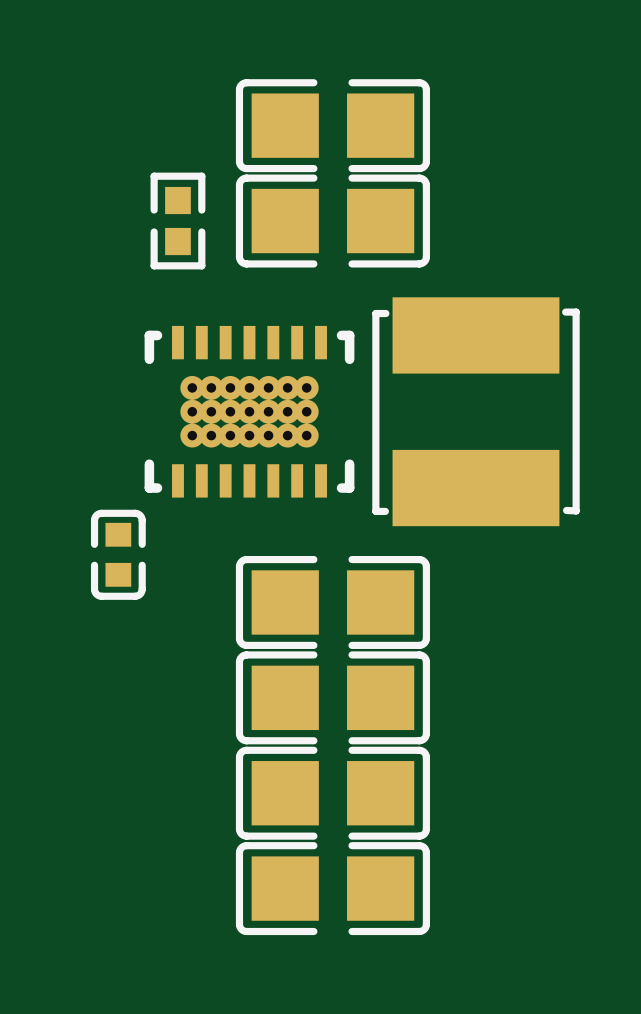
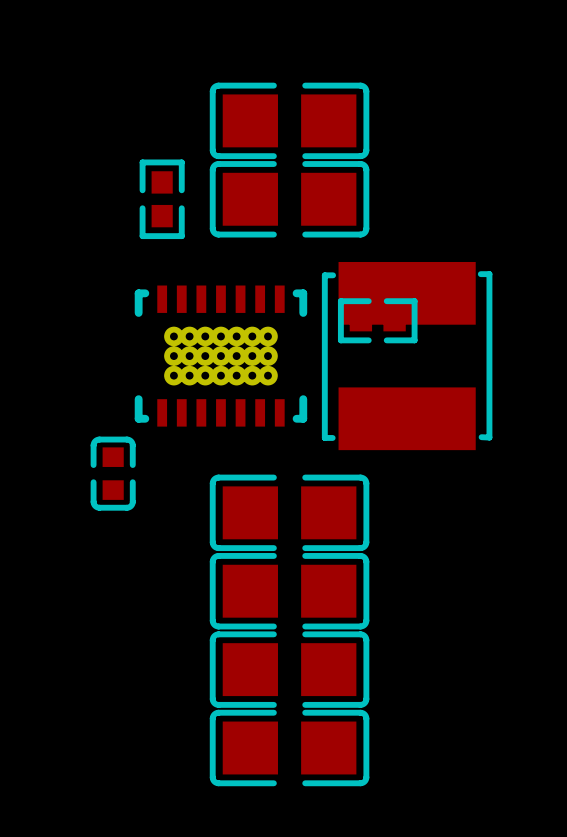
part: none -> (377, 320)

